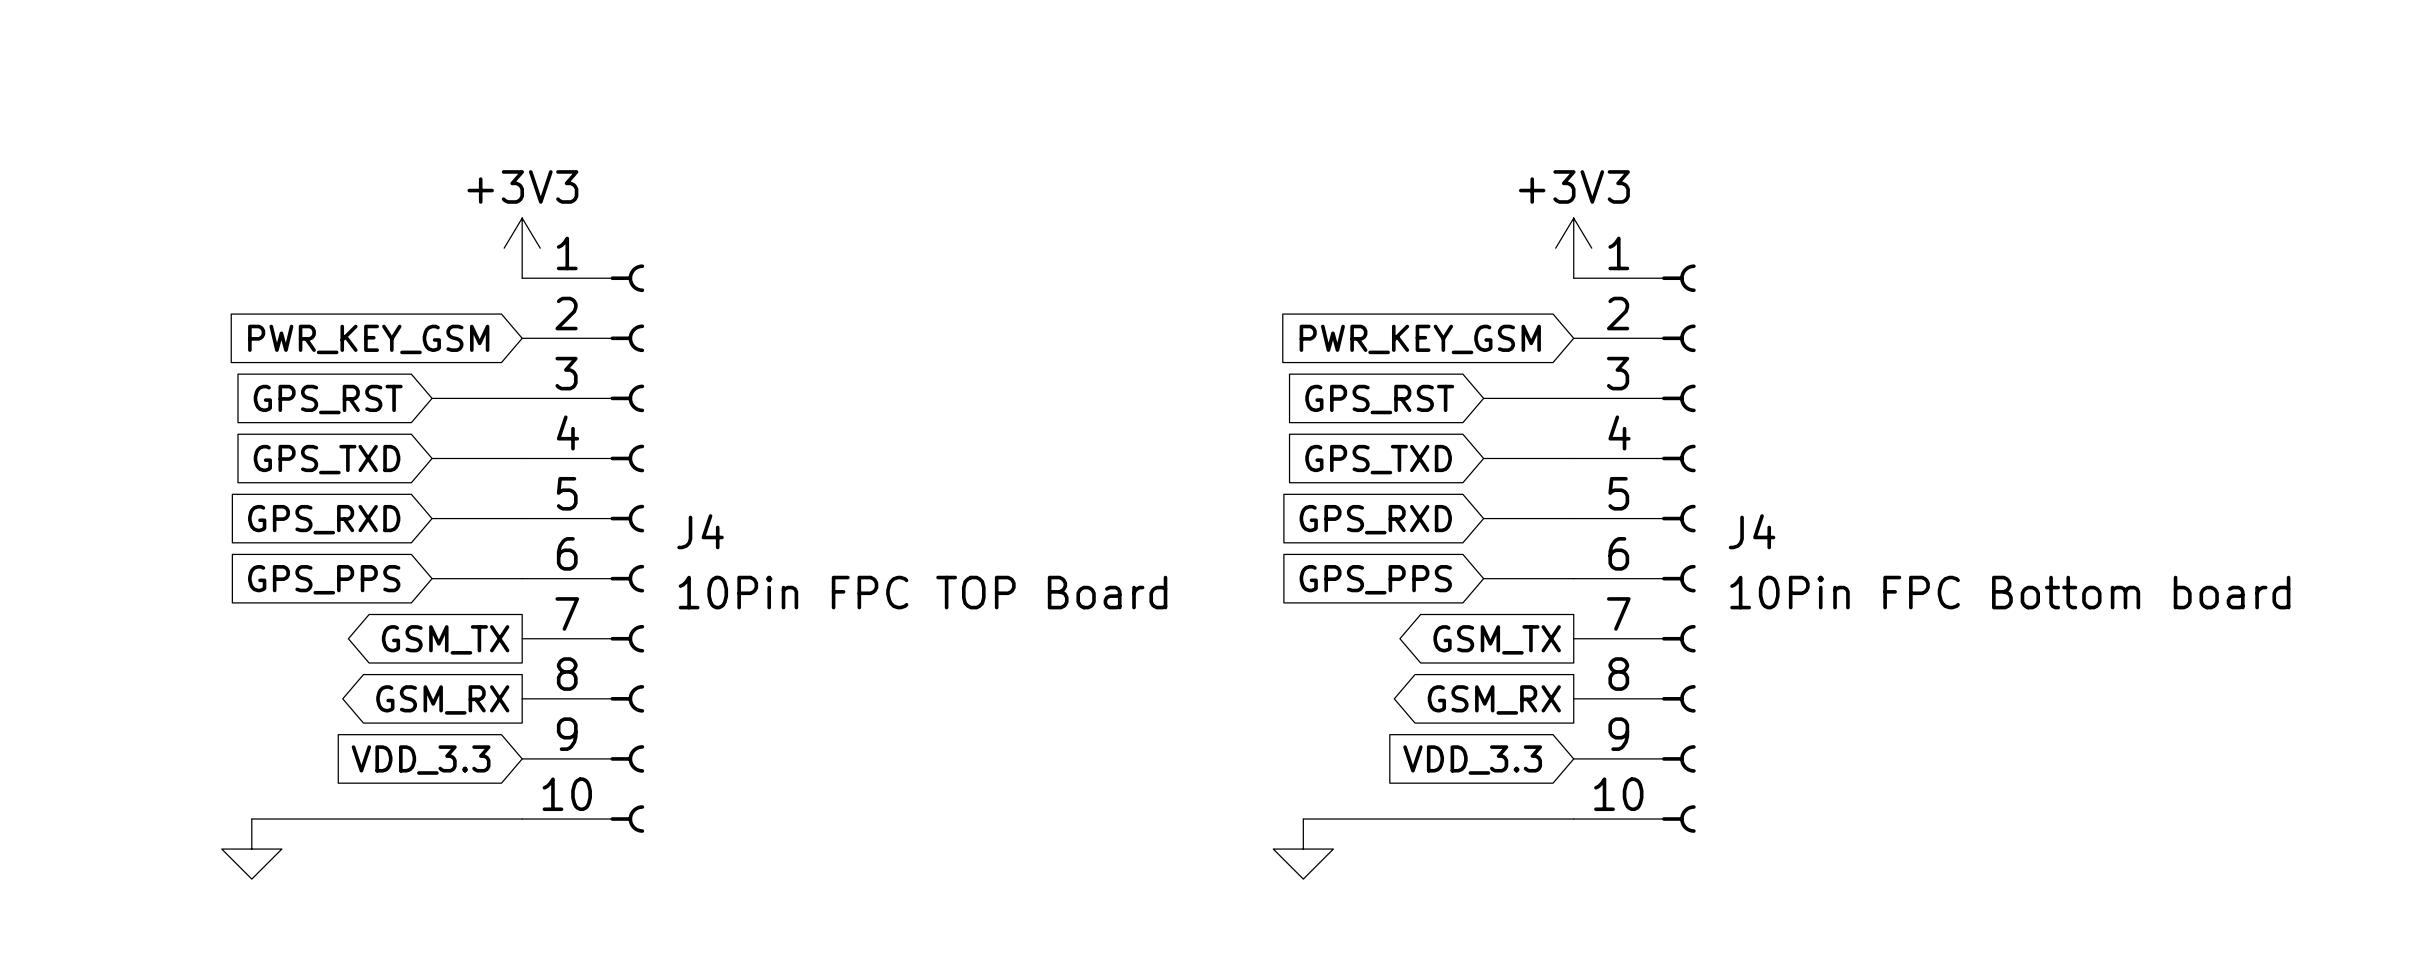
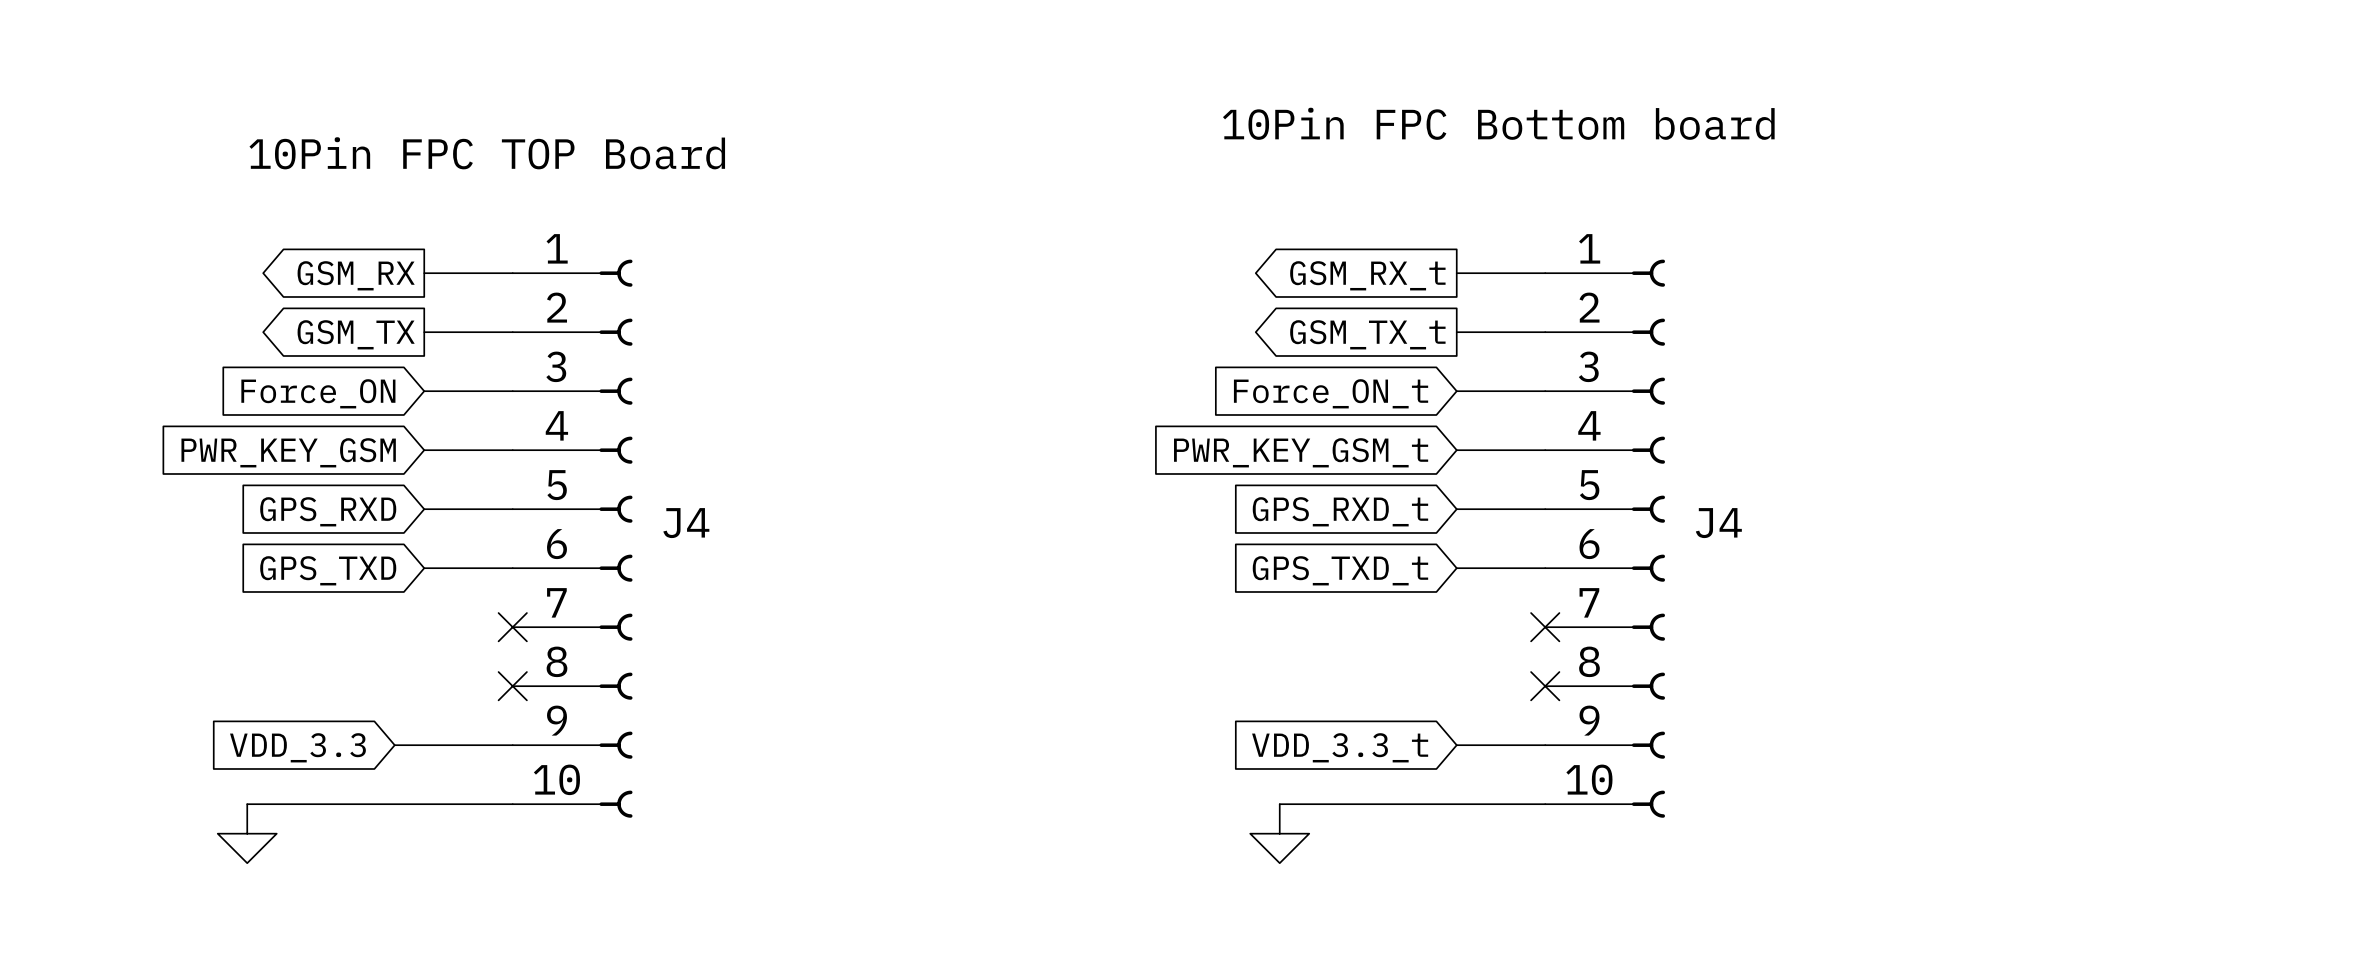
power symbol: +3V3 (522, 248) -> none
power symbol: +3V3 (1573, 248) -> none
wire: none -> (424, 273) (512, 273)
wire: none -> (1456, 273) (1545, 273)
global label: none -> GSM_RX_t (1367, 275)
wire: none -> (424, 332) (512, 332)
wire: none -> (1456, 332) (1545, 332)
global label: PWR_KEY_GSM (368, 339) -> none
global label: none -> GSM_TX_t (1367, 334)
global label: PWR_KEY_GSM (1420, 339) -> none
global label: GPS_RST (328, 399) -> Force_ON (318, 393)
global label: GPS_RST (1379, 399) -> Force_ON_t (1331, 393)
global label: GPS_TXD (327, 459) -> PWR_KEY_GSM (288, 452)
global label: GPS_TXD (1378, 459) -> PWR_KEY_GSM_t (1301, 452)
global label: GPS_RXD (1375, 519) -> GPS_RXD_t (1340, 511)
global label: GPS_PPS (324, 579) -> GPS_TXD (328, 570)
global label: GPS_PPS (1375, 579) -> GPS_TXD_t (1340, 570)
J4 value position: 10Pin FPC TOP Board (923, 592) -> 10Pin FPC TOP Board (487, 153)
J4 value position: 10Pin FPC Bottom board (2010, 592) -> 10Pin FPC Bottom board (1498, 123)
no-connect mark: none -> (512, 627)
no-connect mark: none -> (1545, 627)
global label position: GSM_TX (445, 639) -> GSM_TX (356, 334)
global label: GSM_TX (1497, 639) -> none
no-connect mark: none -> (512, 686)
no-connect mark: none -> (1545, 686)
global label position: GSM_RX (442, 699) -> GSM_RX (356, 275)
global label: GSM_RX (1494, 699) -> none
wire: none -> (394, 745) (512, 745)
wire: none -> (1456, 745) (1545, 745)
global label position: VDD_3.3 (421, 760) -> VDD_3.3 (297, 747)
global label: VDD_3.3 (1472, 760) -> VDD_3.3_t (1340, 747)

